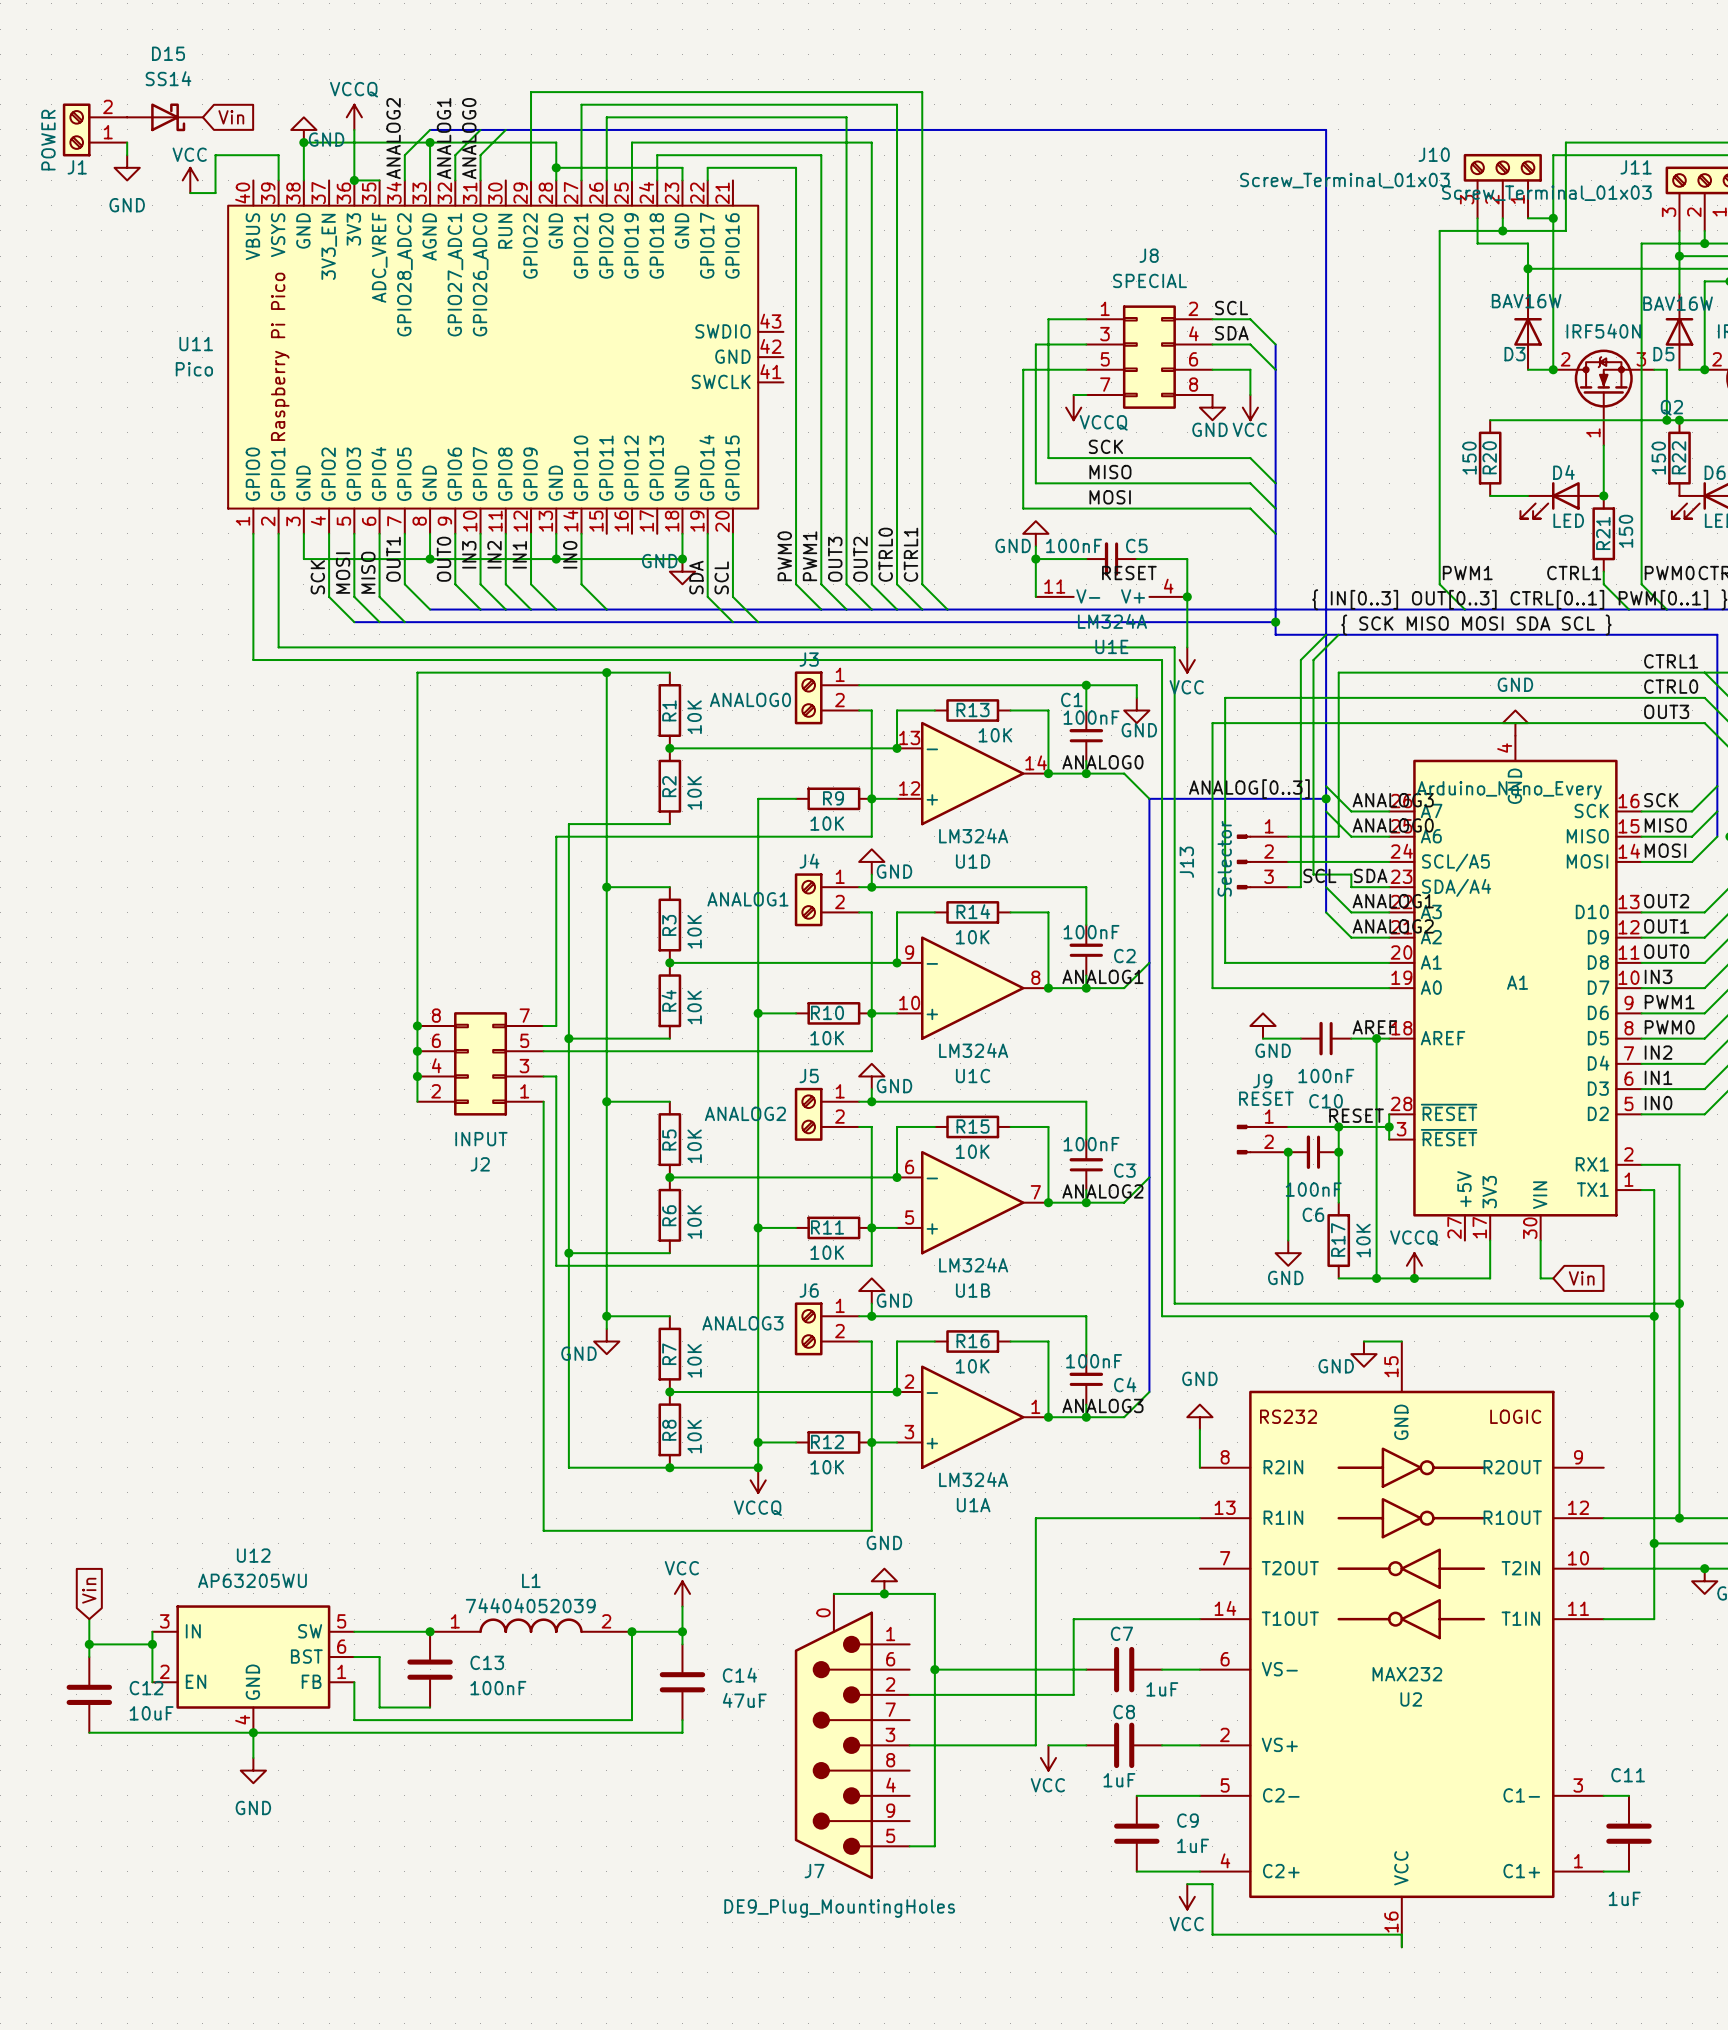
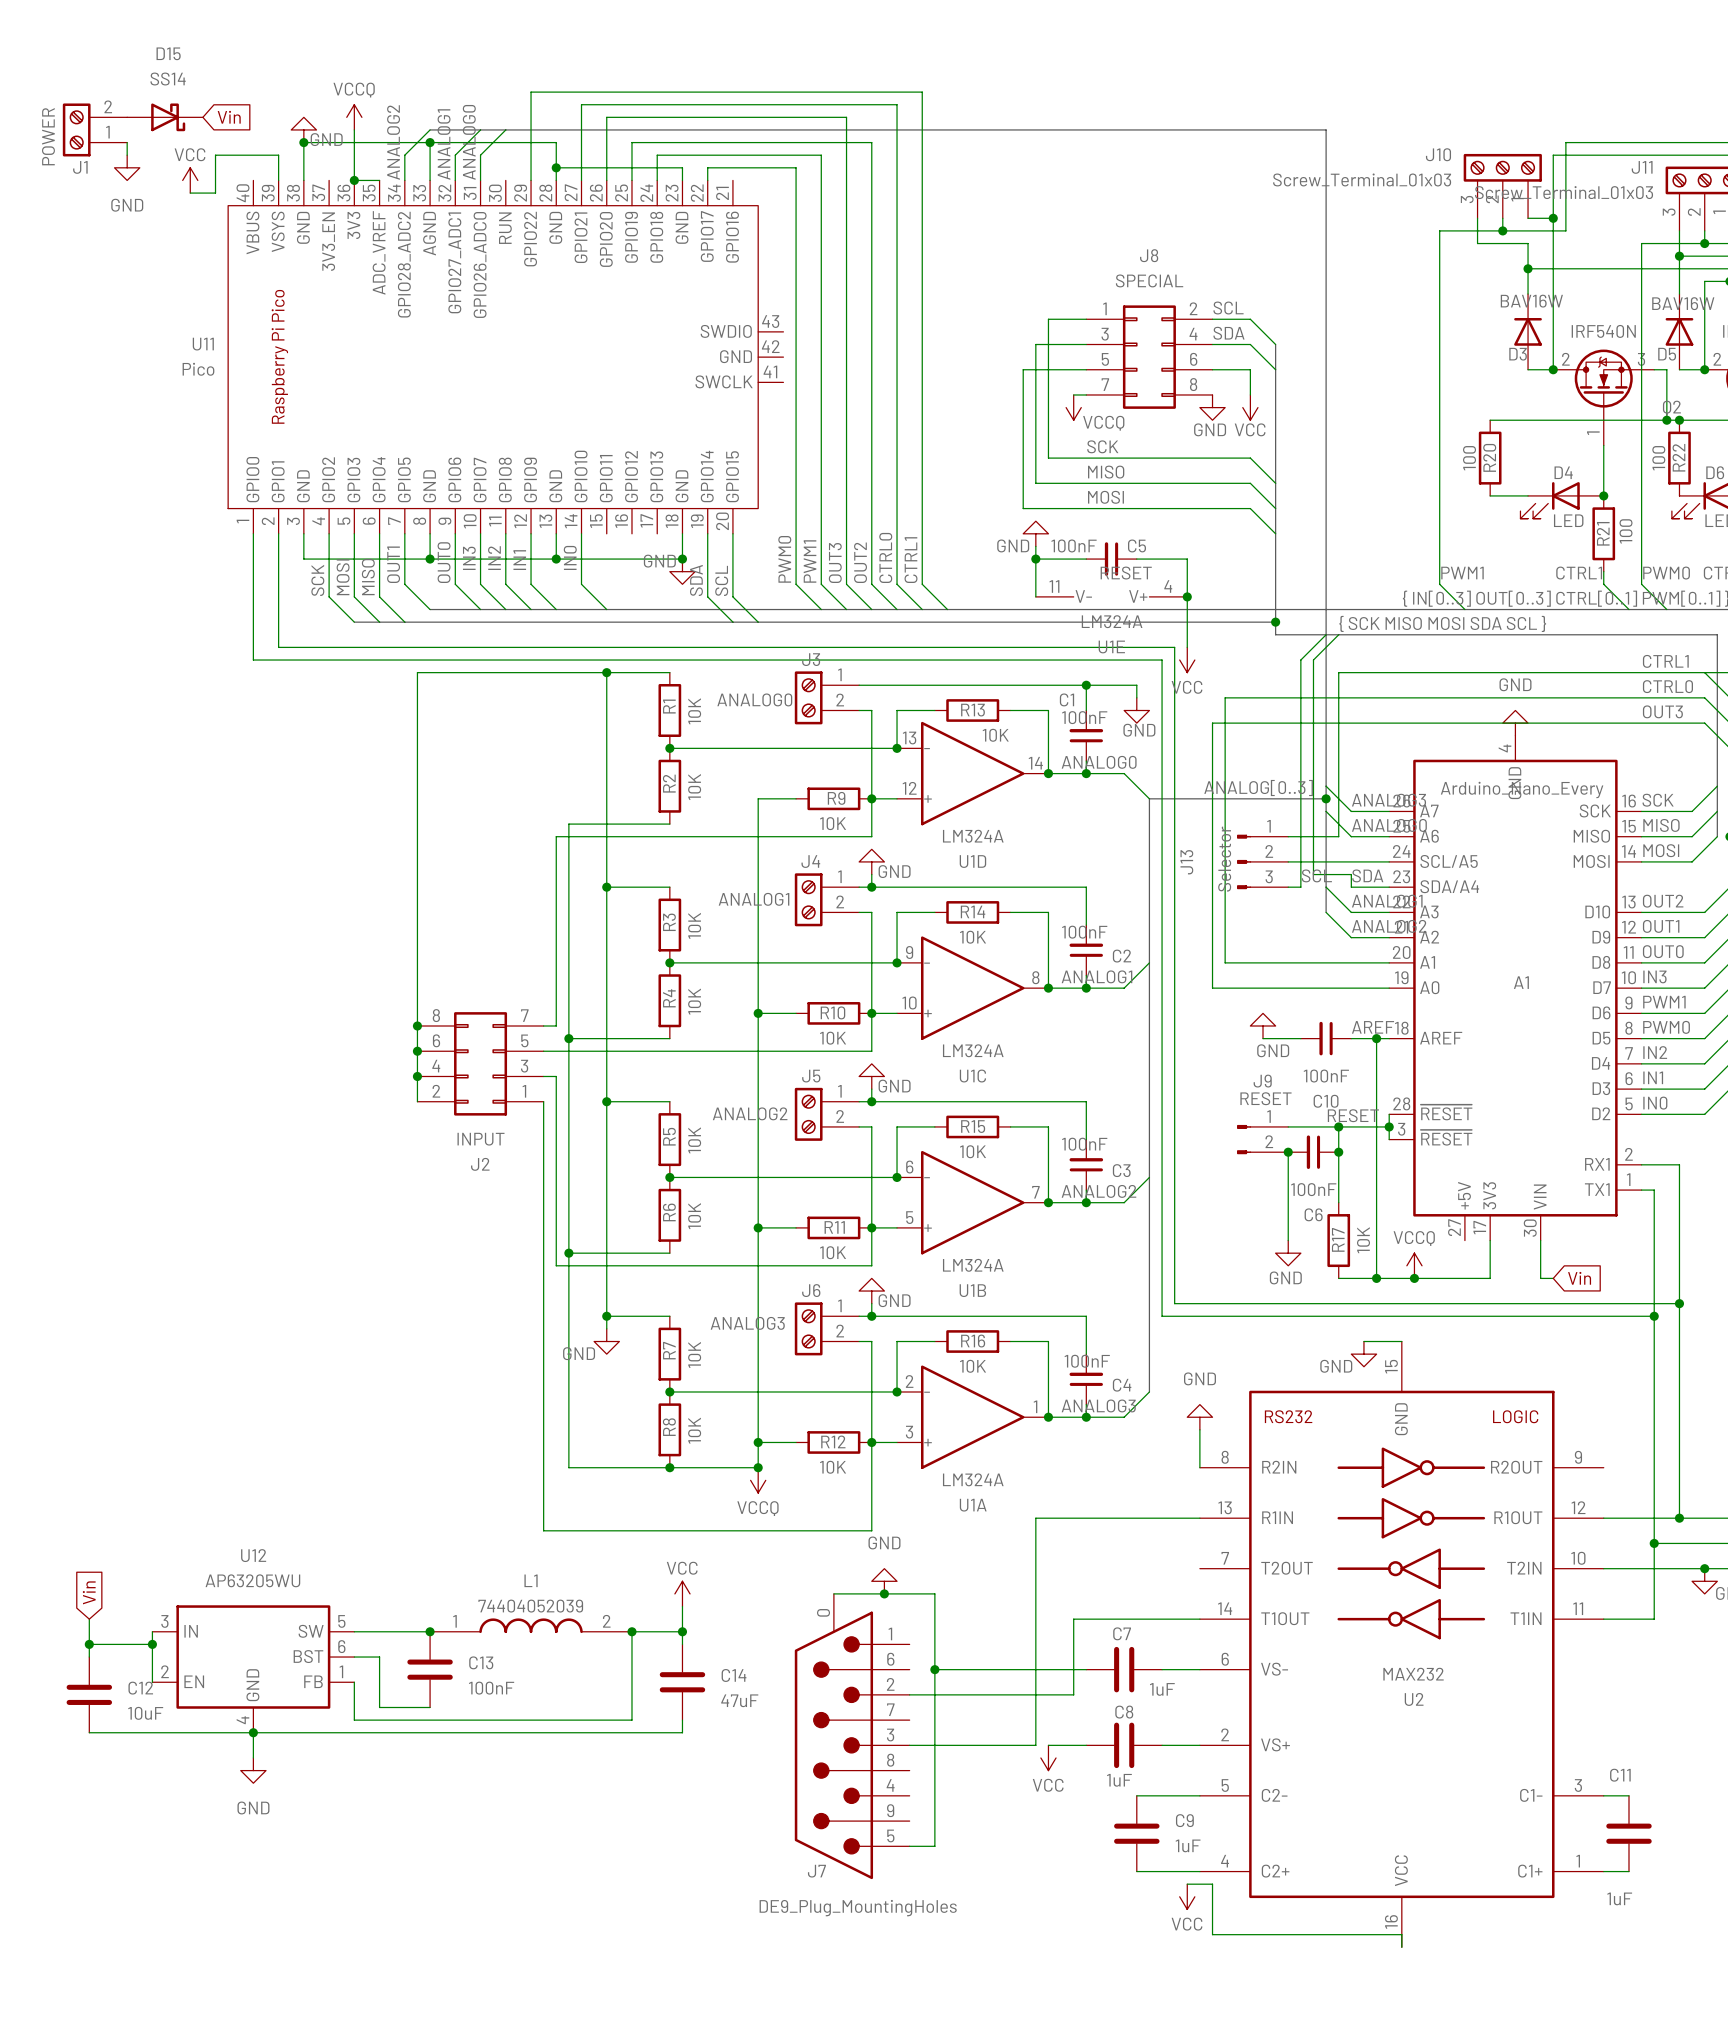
R20 value: 150 (1469, 458) -> 100 (1469, 458)
R22 value: 150 (1658, 458) -> 100 (1658, 458)
R21 value: 150 (1625, 531) -> 100 (1626, 531)

